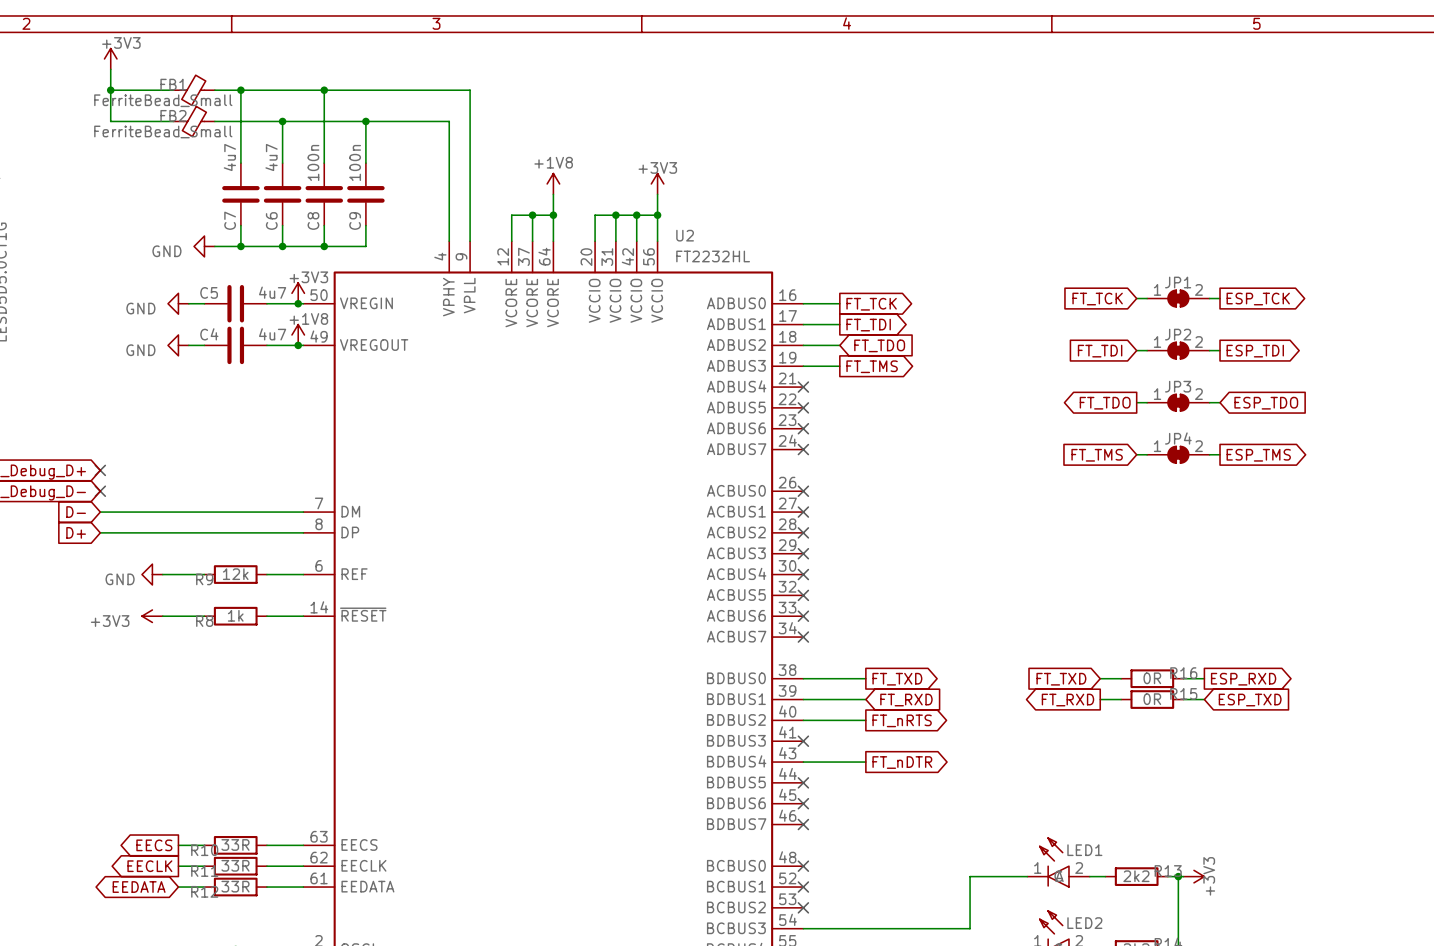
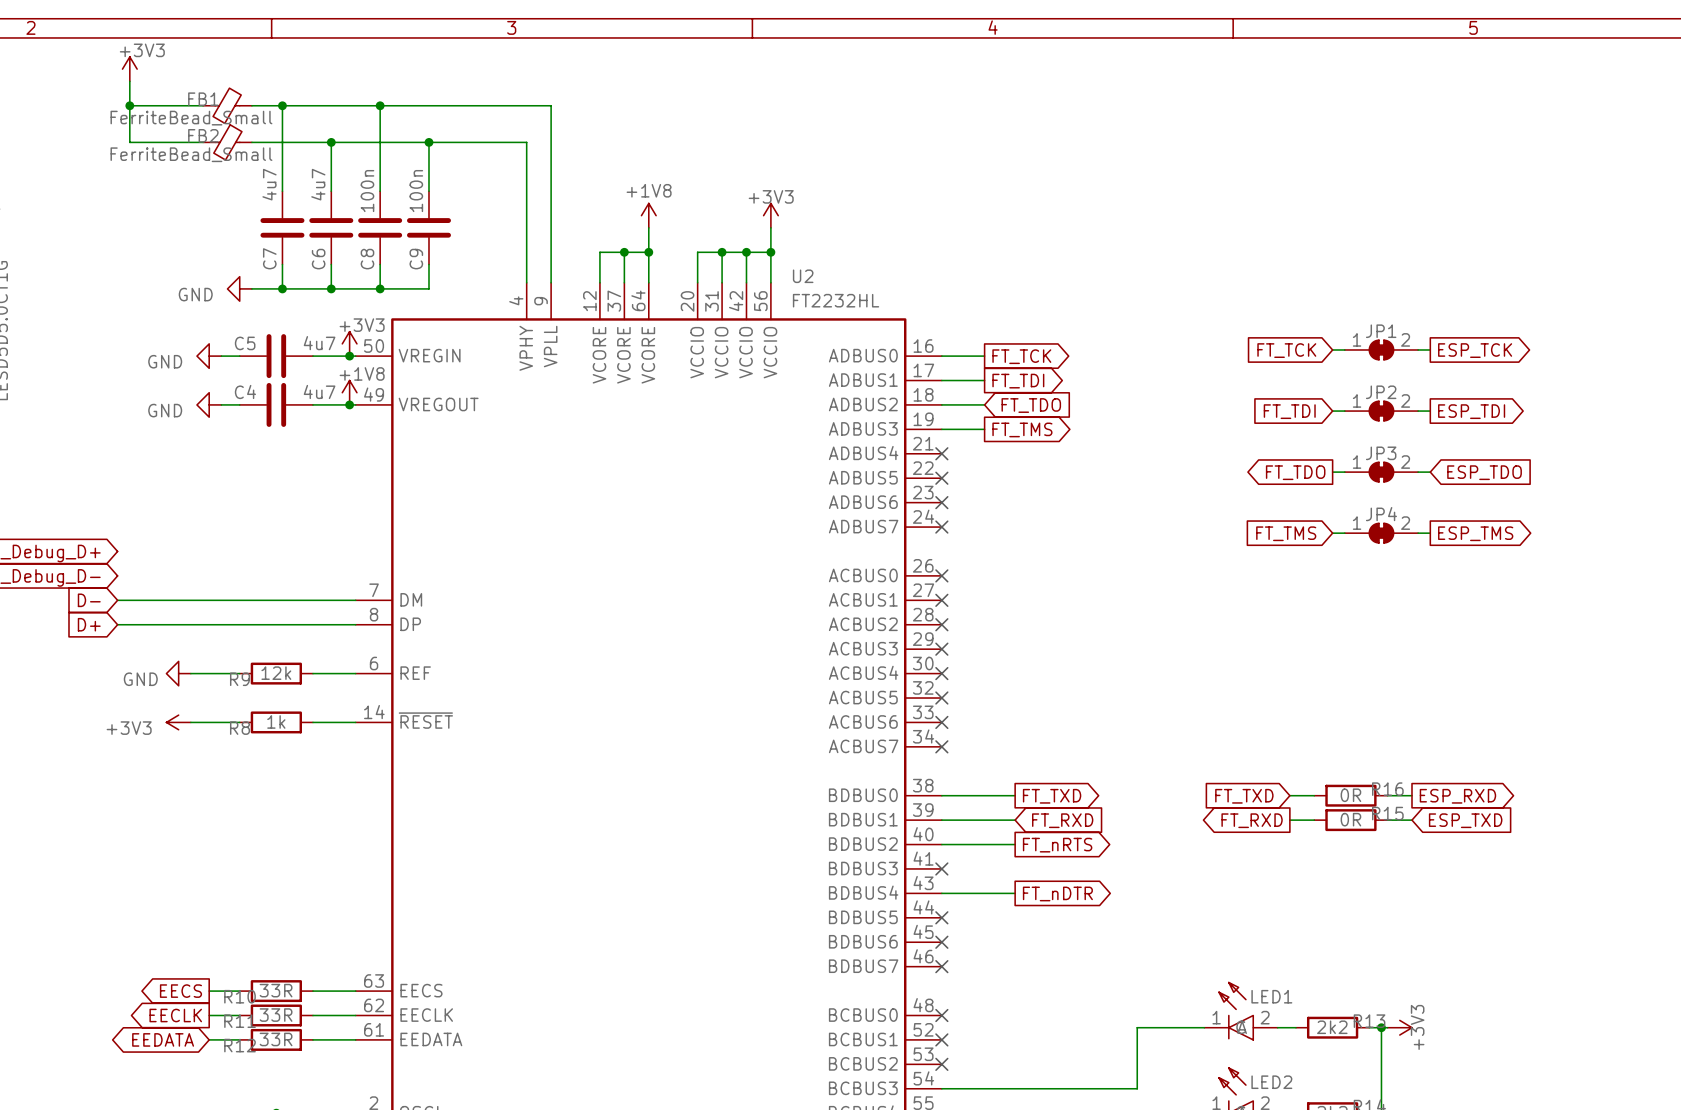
no-connect mark: (100, 470) -> none
no-connect mark: (100, 491) -> none

